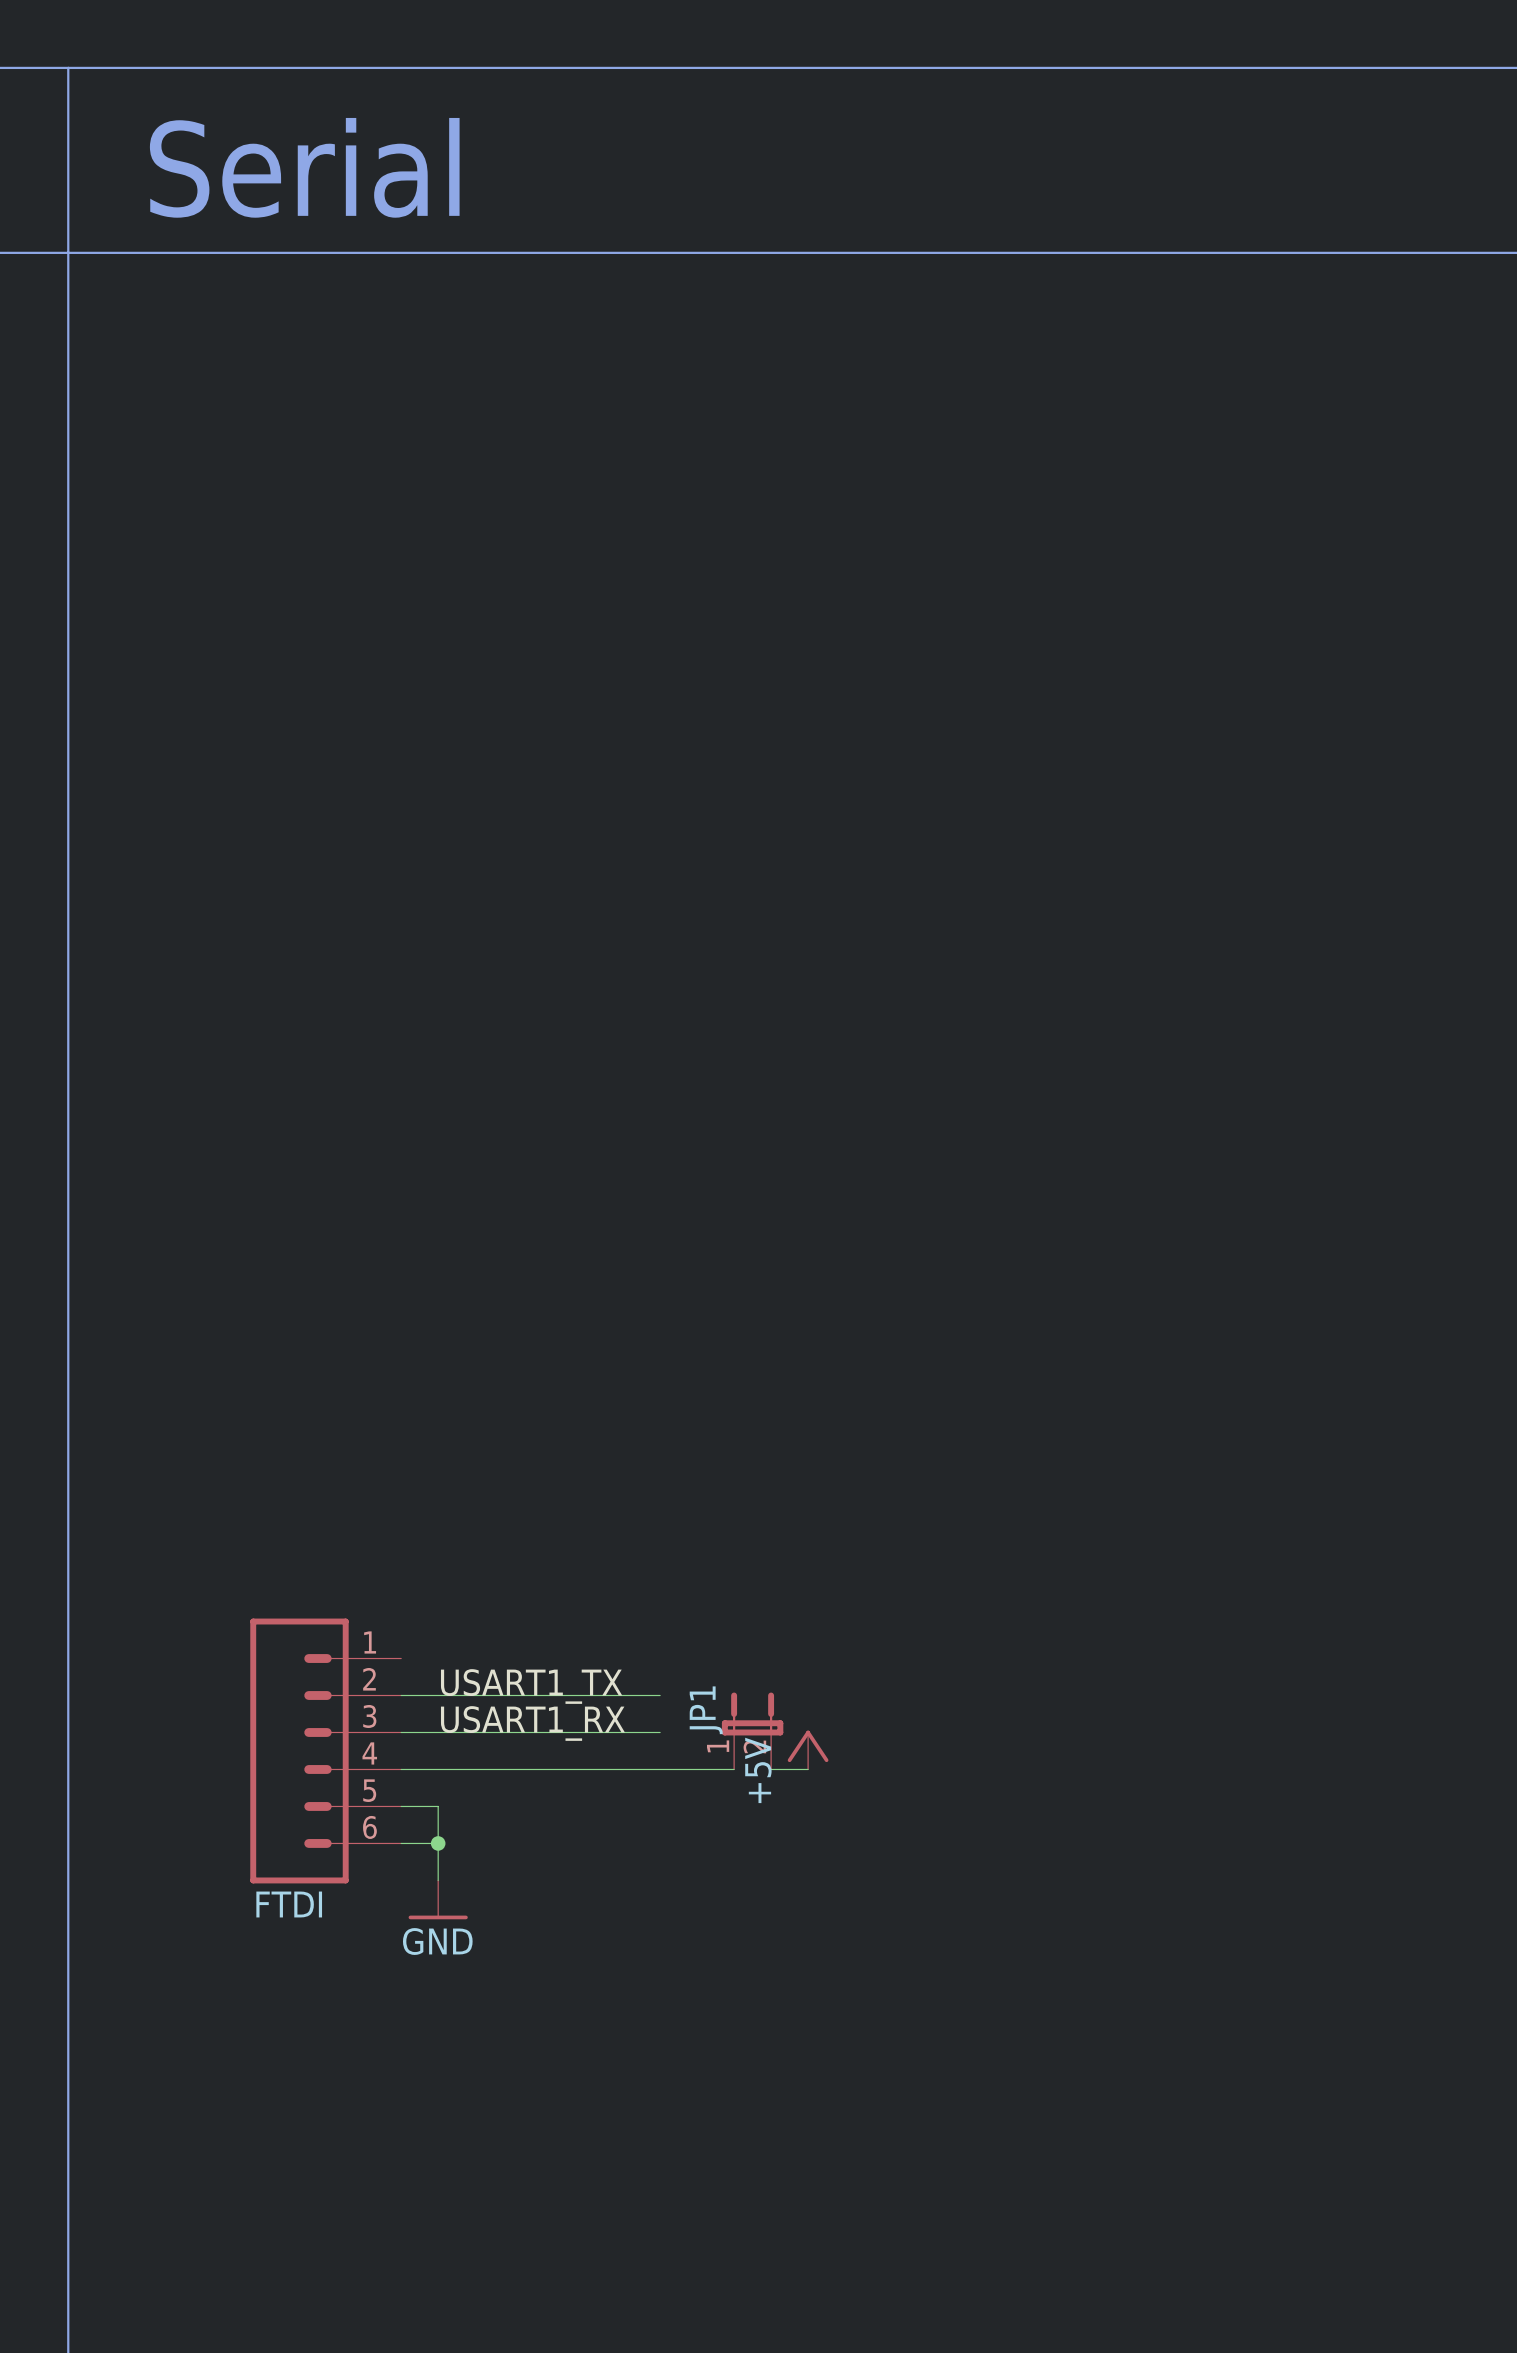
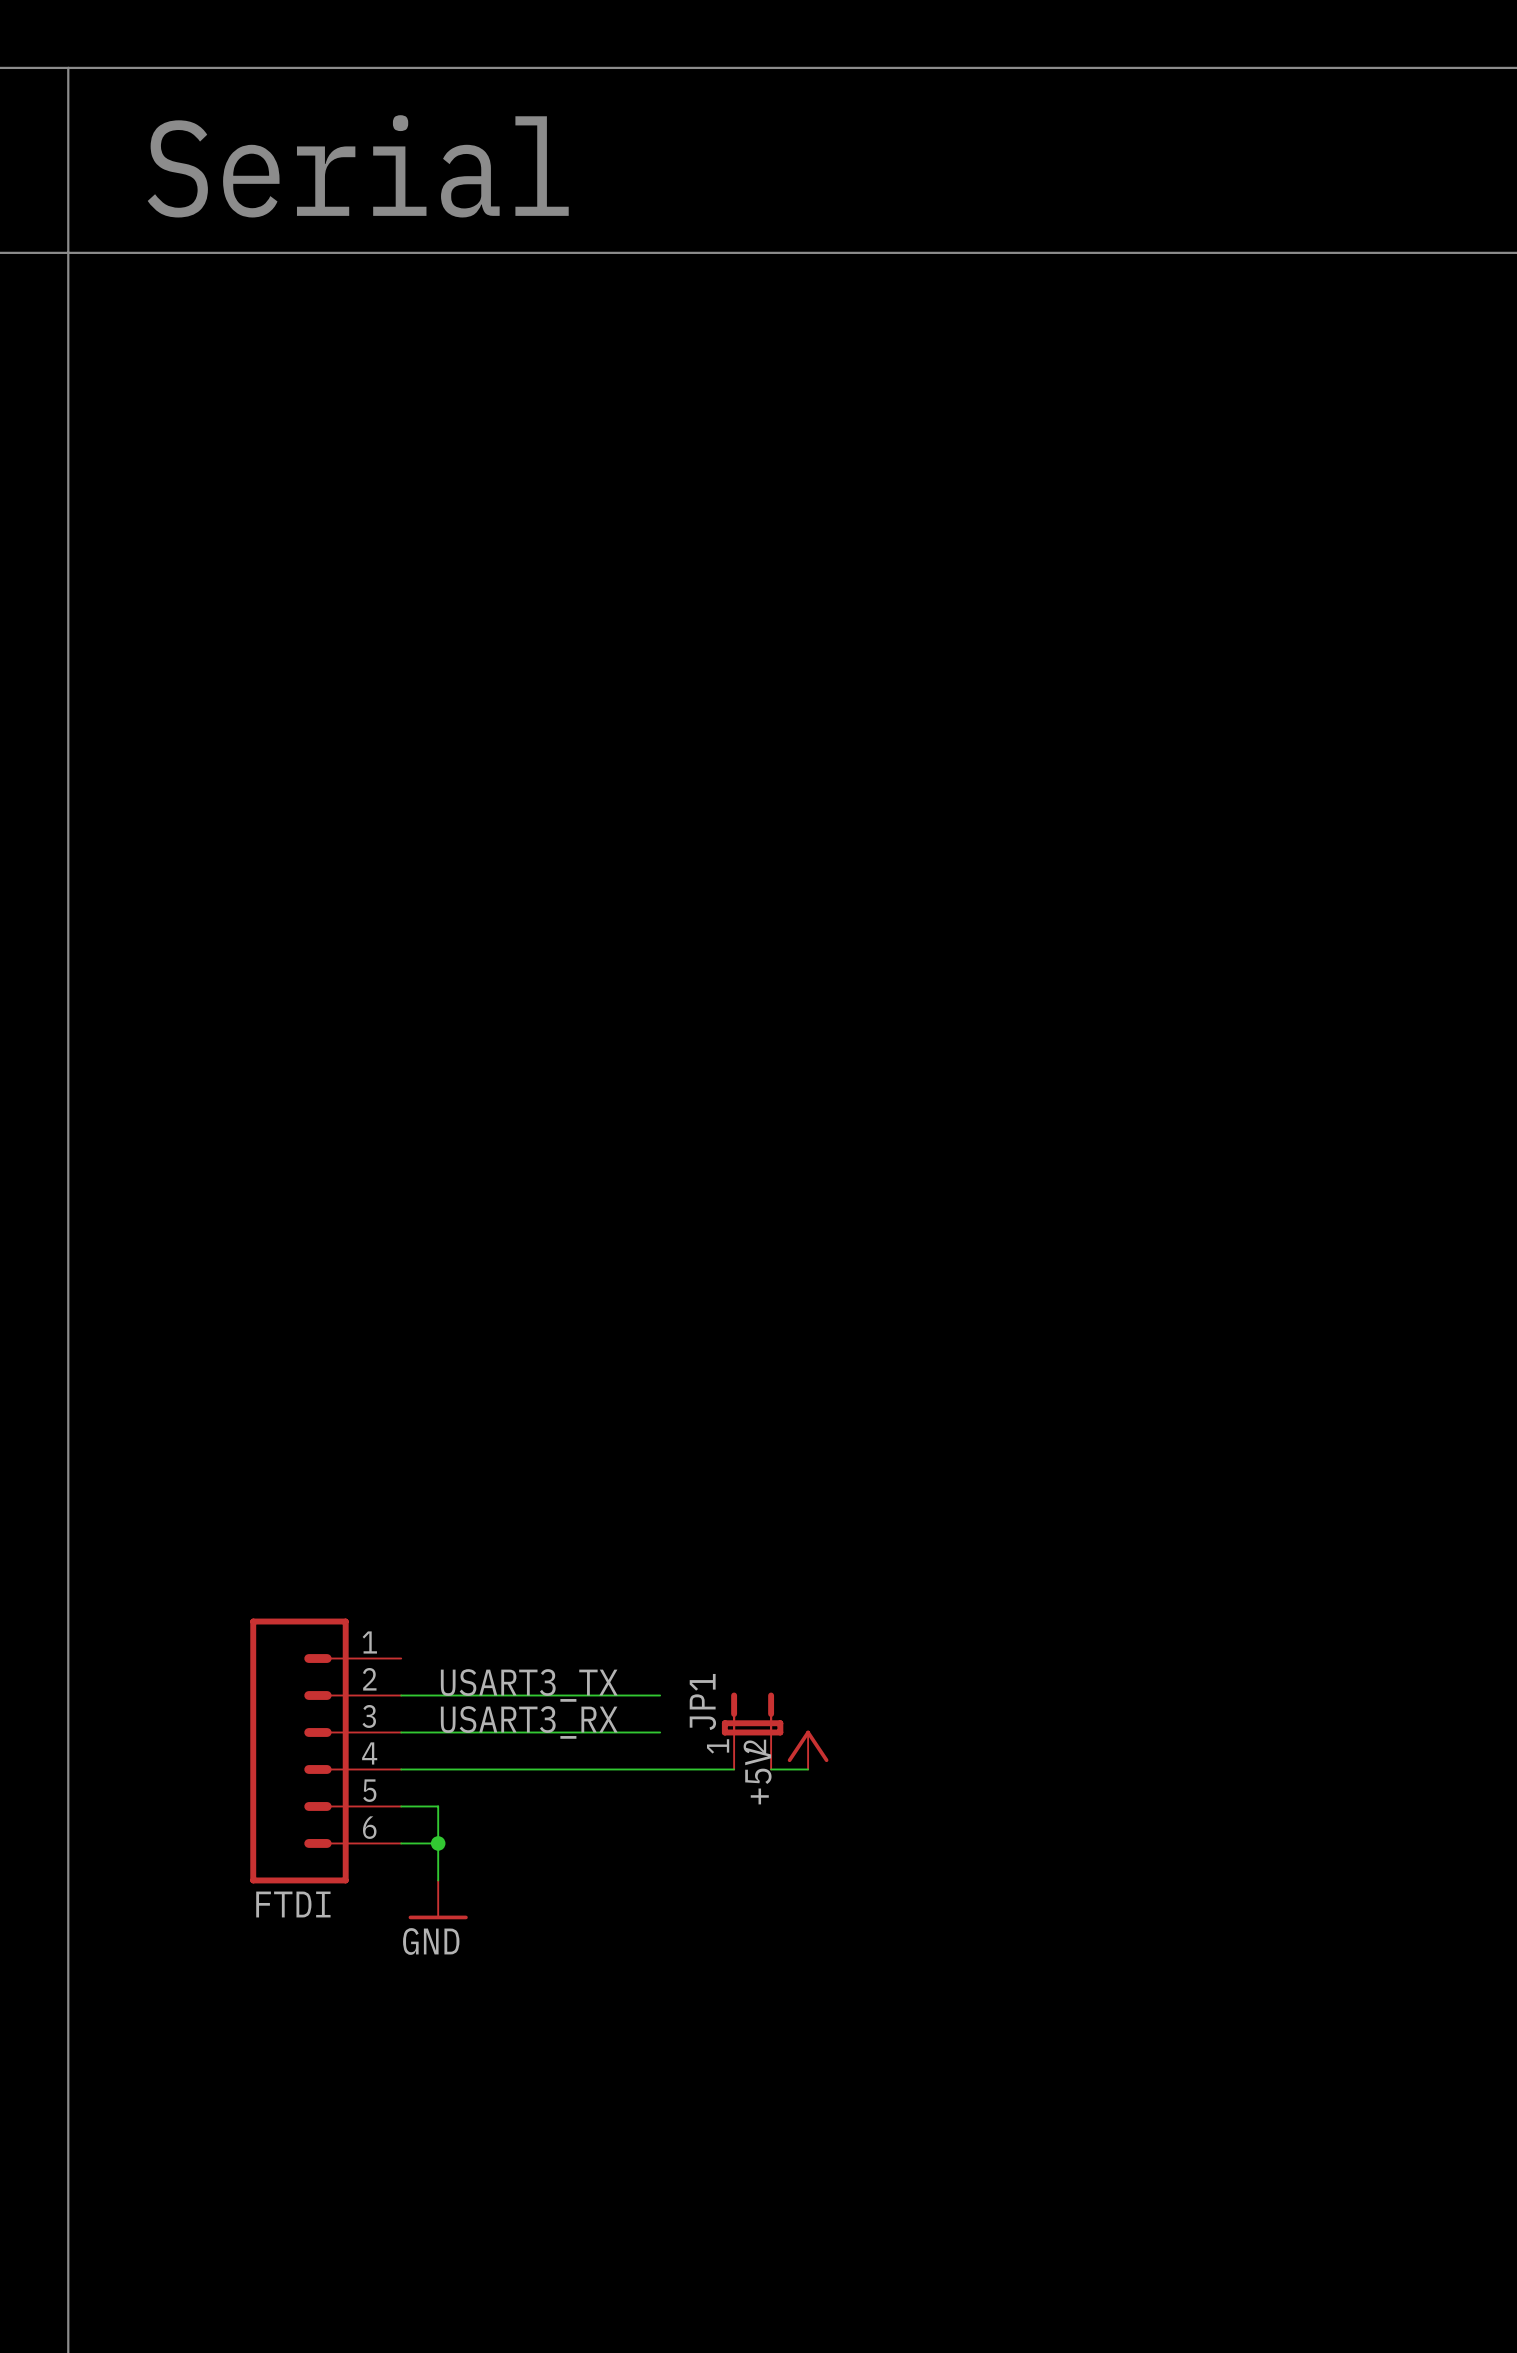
label: USART1_TX (531, 1686) -> USART3_TX (529, 1685)
label: USART1_RX (532, 1723) -> USART3_RX (529, 1722)

